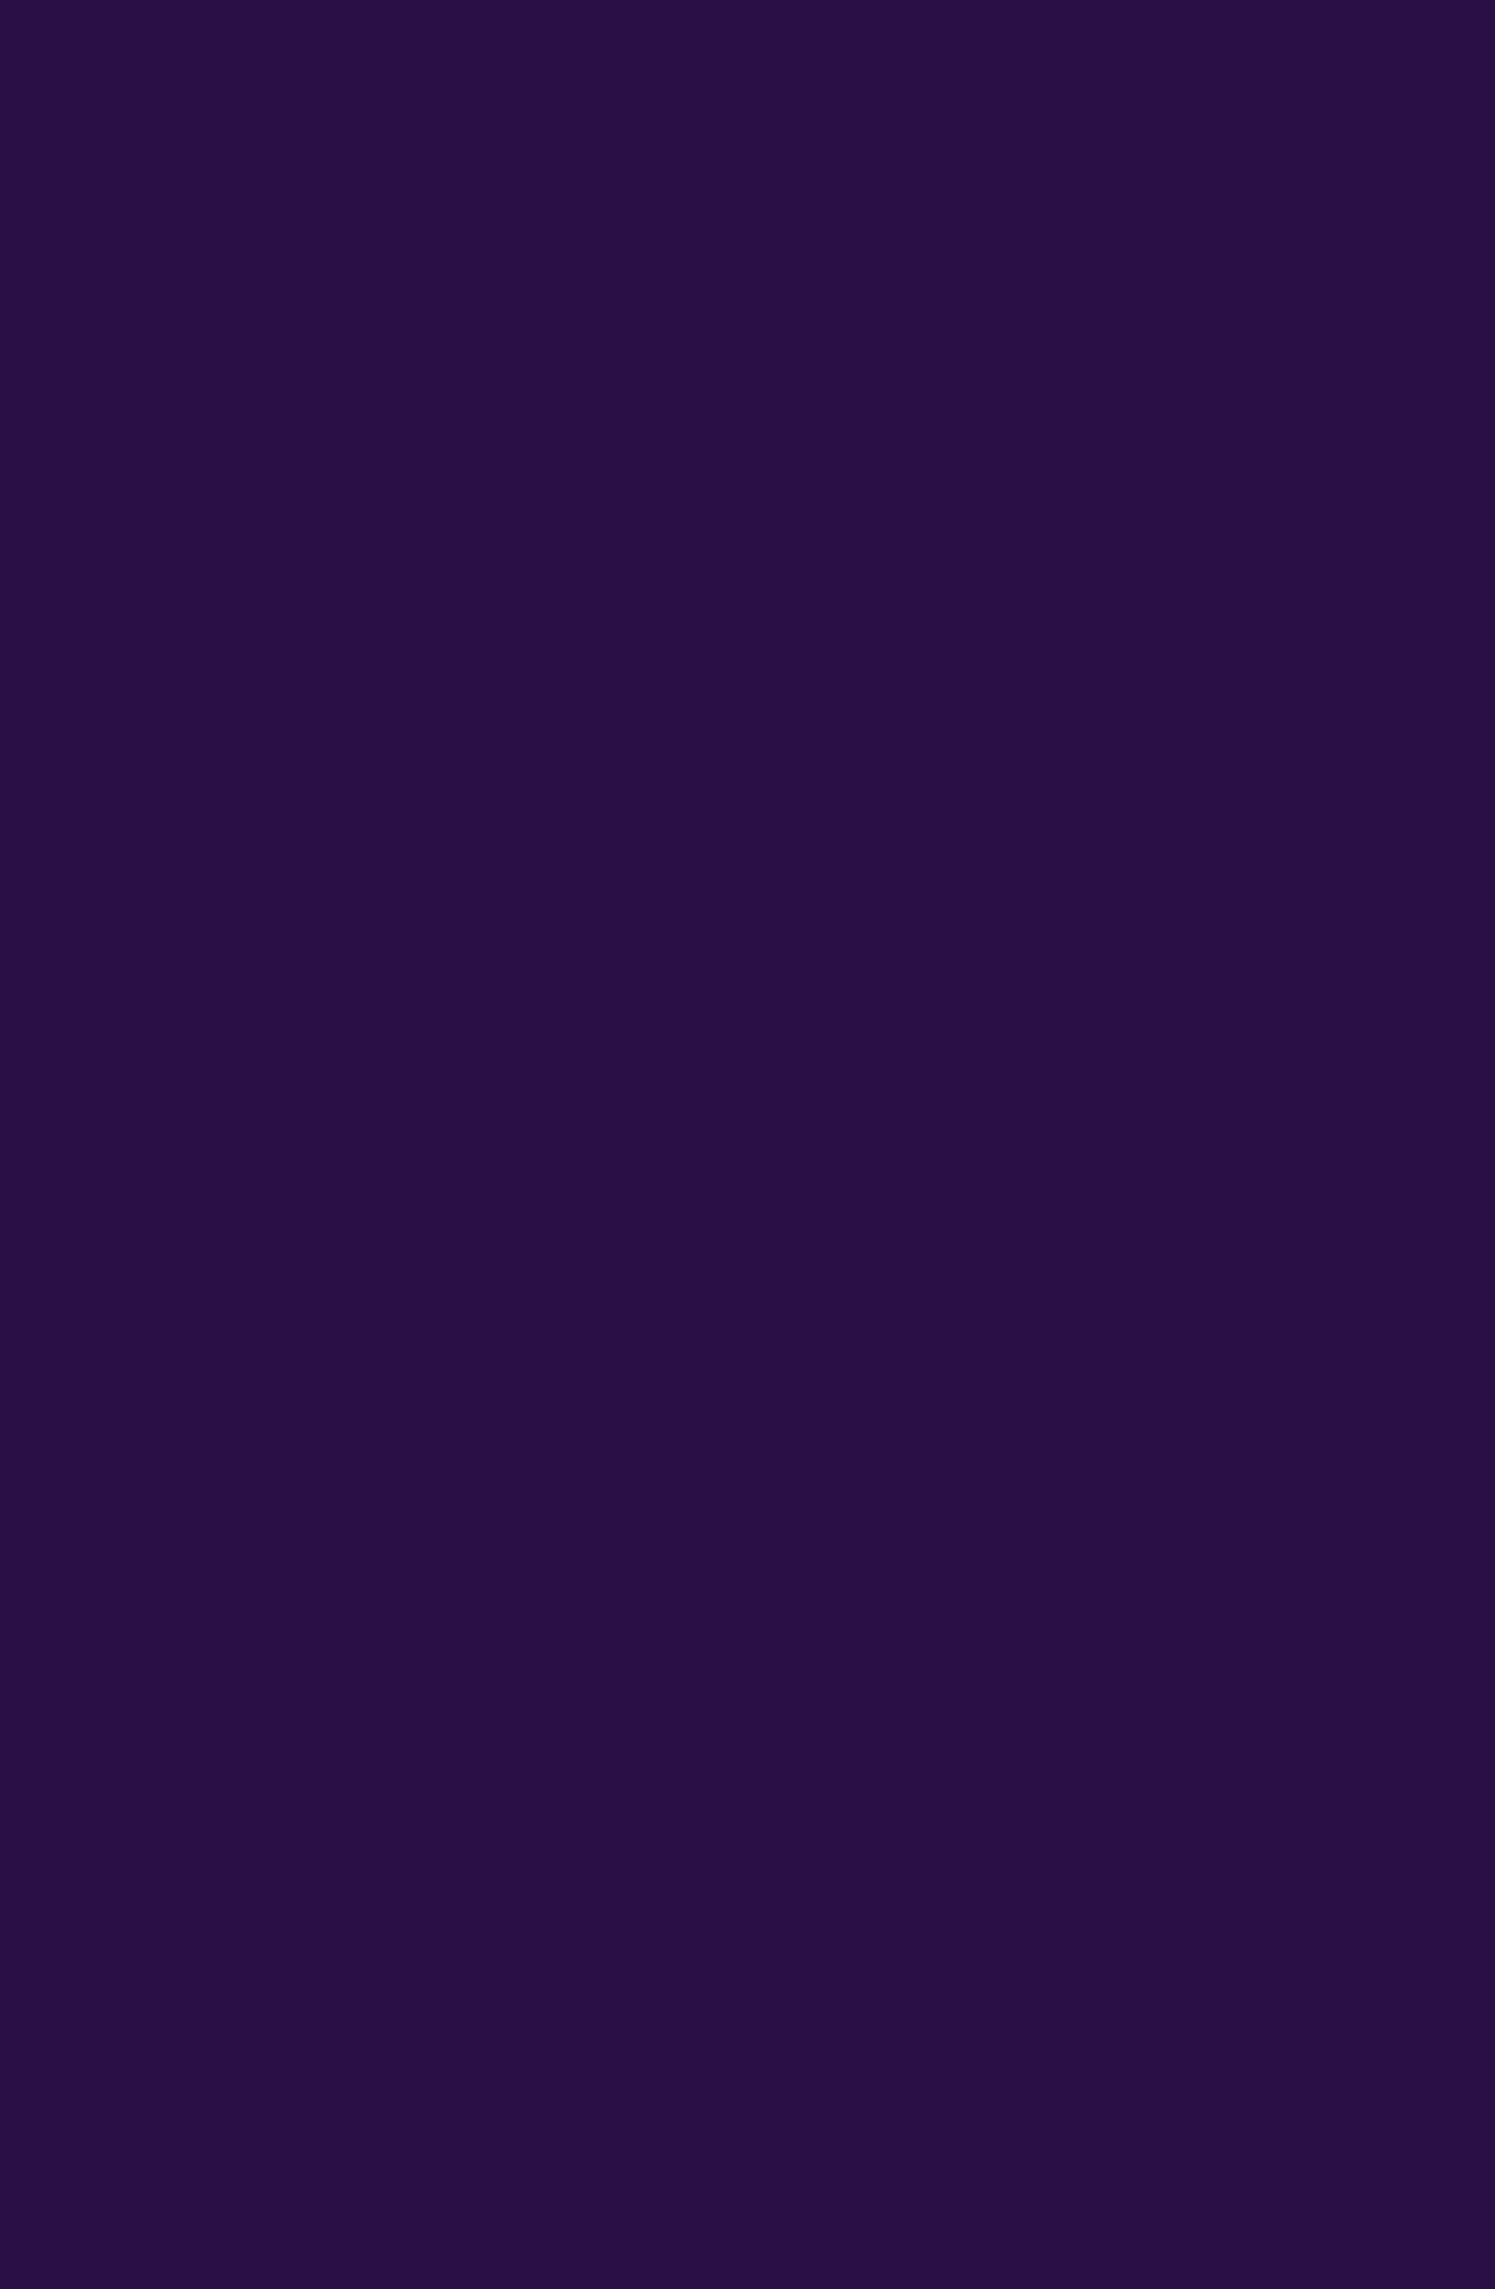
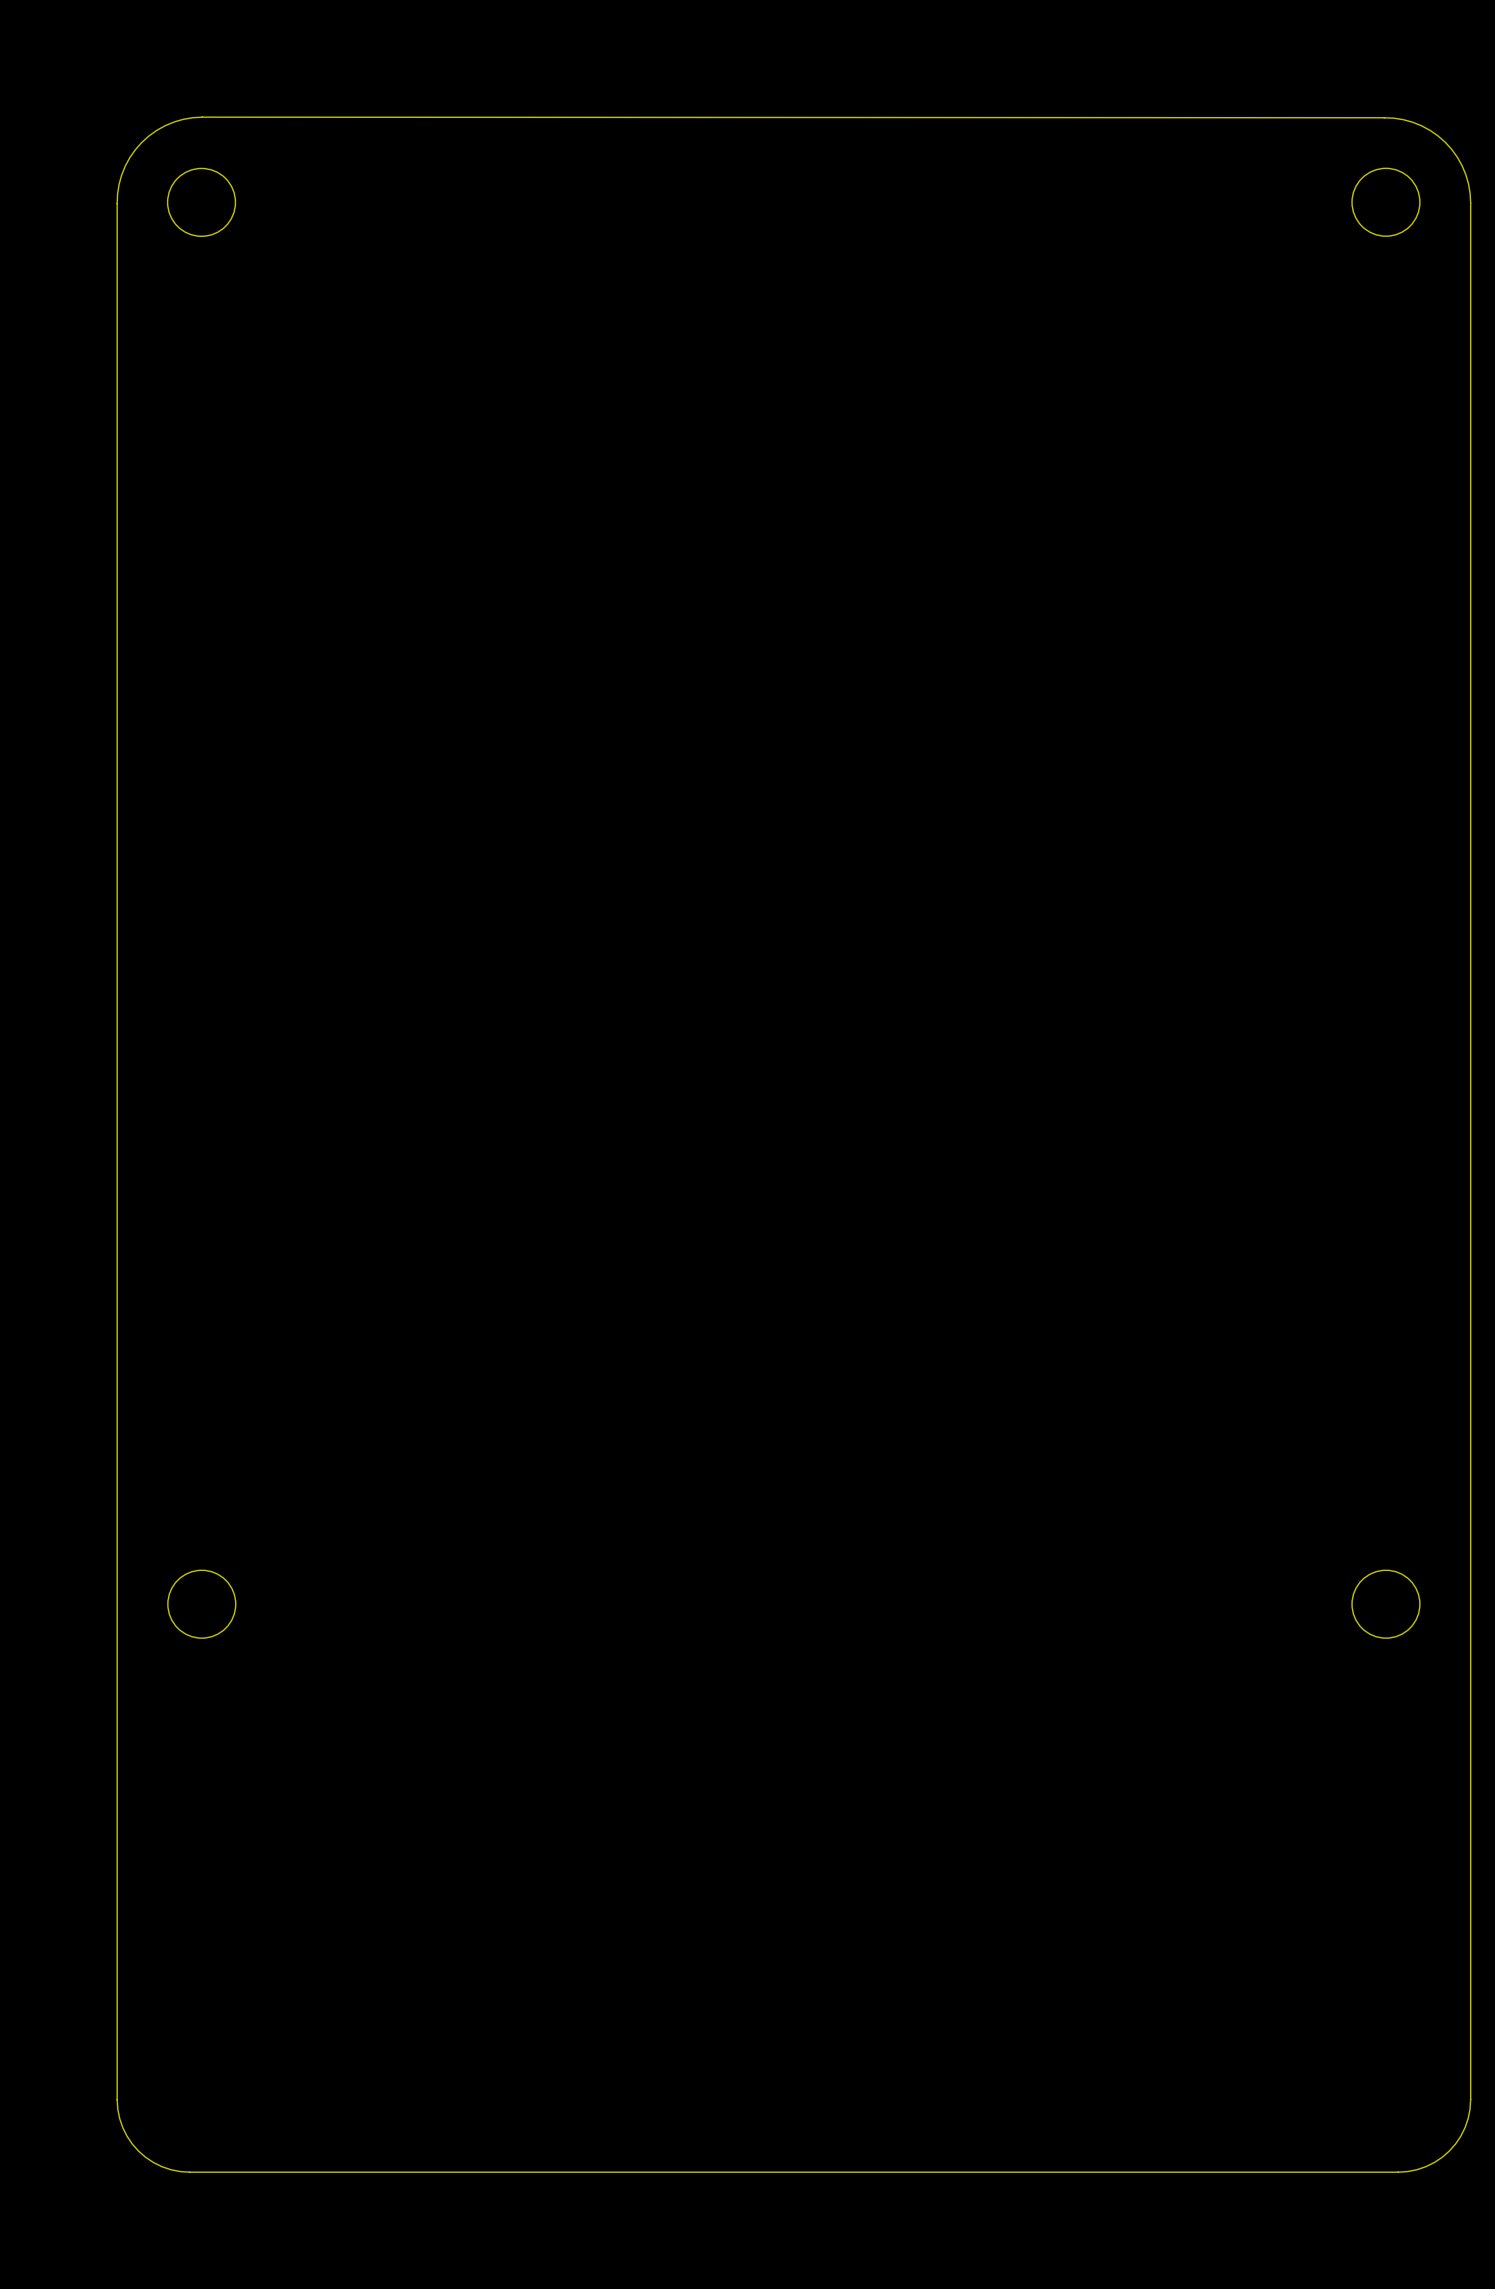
board edge: none -> (202, 117) (1384, 117) (1412, 122) (1430, 130) (1445, 142) (1457, 157) (1468, 183) (1470, 202) (1470, 2099) (1468, 2118) (1460, 2135) (1449, 2150) (1434, 2162) (1416, 2169) (1398, 2172) (189, 2172) (170, 2169) (153, 2162) (138, 2150) (126, 2135) (119, 2118) (117, 2099) (117, 203) (119, 184) (125, 166) (141, 142) (165, 125) (183, 119) (202, 117)
round board edge: none -> [167, 167, 237, 237]
round board edge: none -> [1351, 167, 1421, 237]
round board edge: none -> [167, 1569, 237, 1639]
round board edge: none -> [1351, 1569, 1421, 1639]

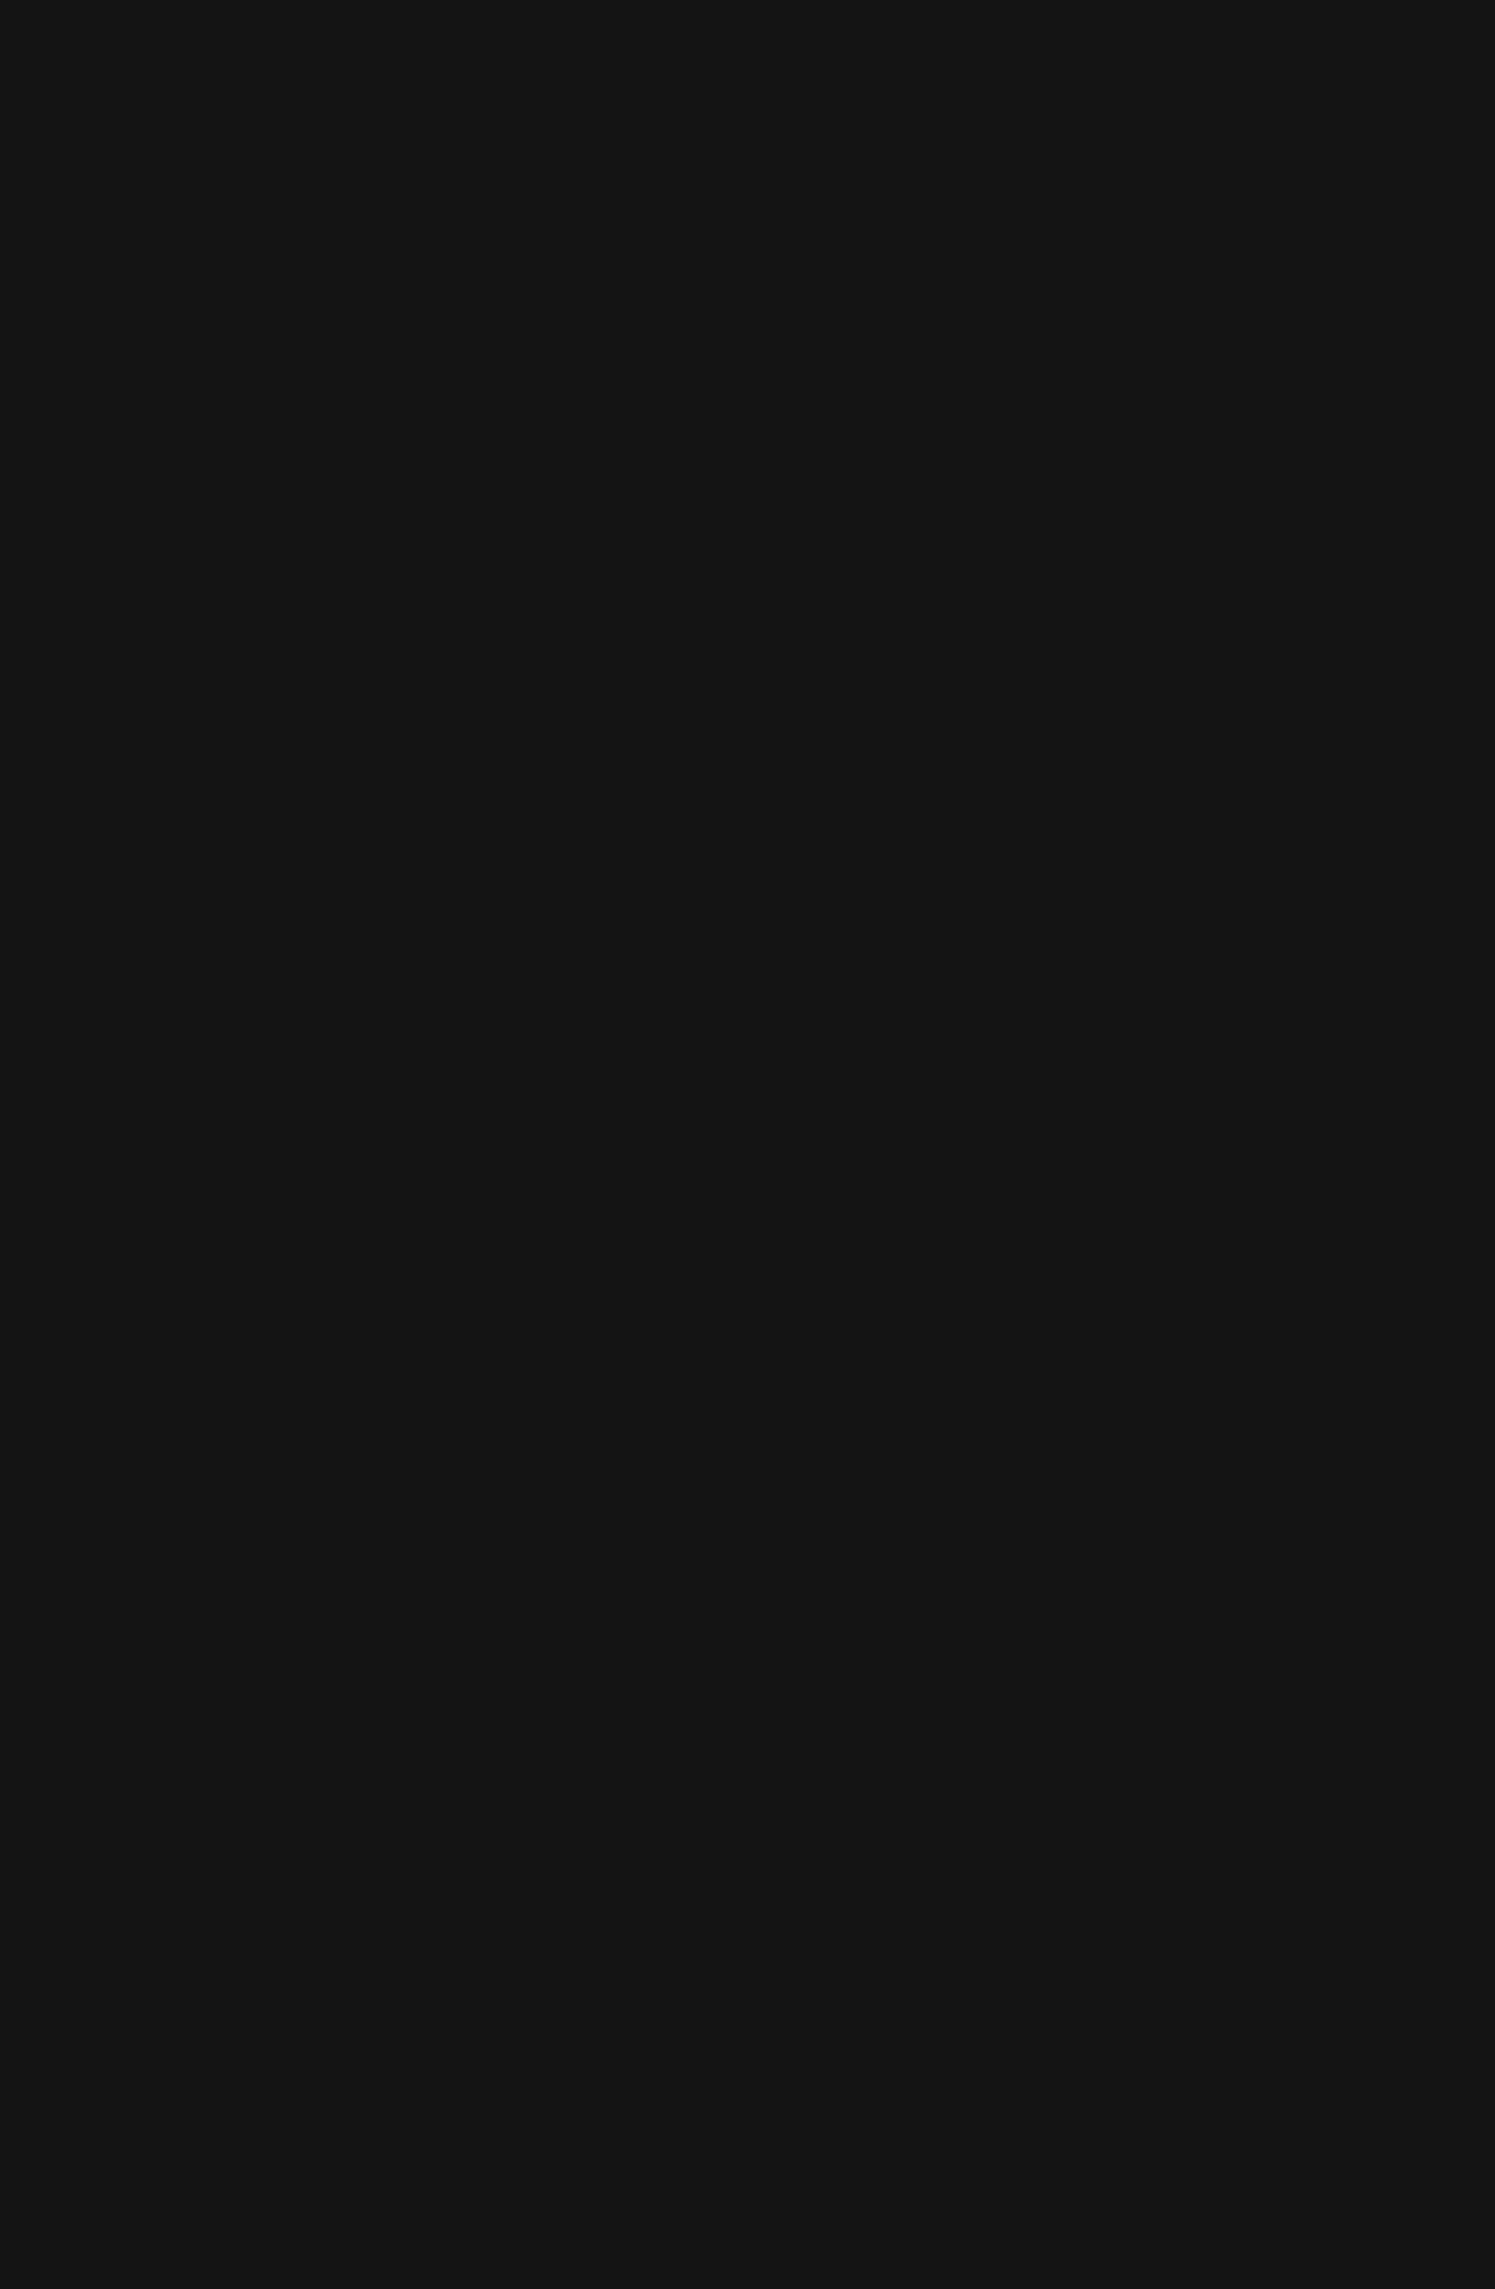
board edge: (202, 117) (1384, 117) (1412, 122) (1430, 130) (1445, 142) (1457, 157) (1468, 183) (1470, 202) (1470, 2099) (1468, 2118) (1460, 2135) (1449, 2150) (1434, 2162) (1416, 2169) (1398, 2172) (189, 2172) (170, 2169) (153, 2162) (138, 2150) (126, 2135) (119, 2118) (117, 2099) (117, 203) (119, 184) (125, 166) (141, 142) (165, 125) (183, 119) (202, 117) -> none
round board edge: [167, 167, 237, 237] -> none
round board edge: [1351, 167, 1421, 237] -> none
round board edge: [167, 1569, 237, 1639] -> none
round board edge: [1351, 1569, 1421, 1639] -> none

